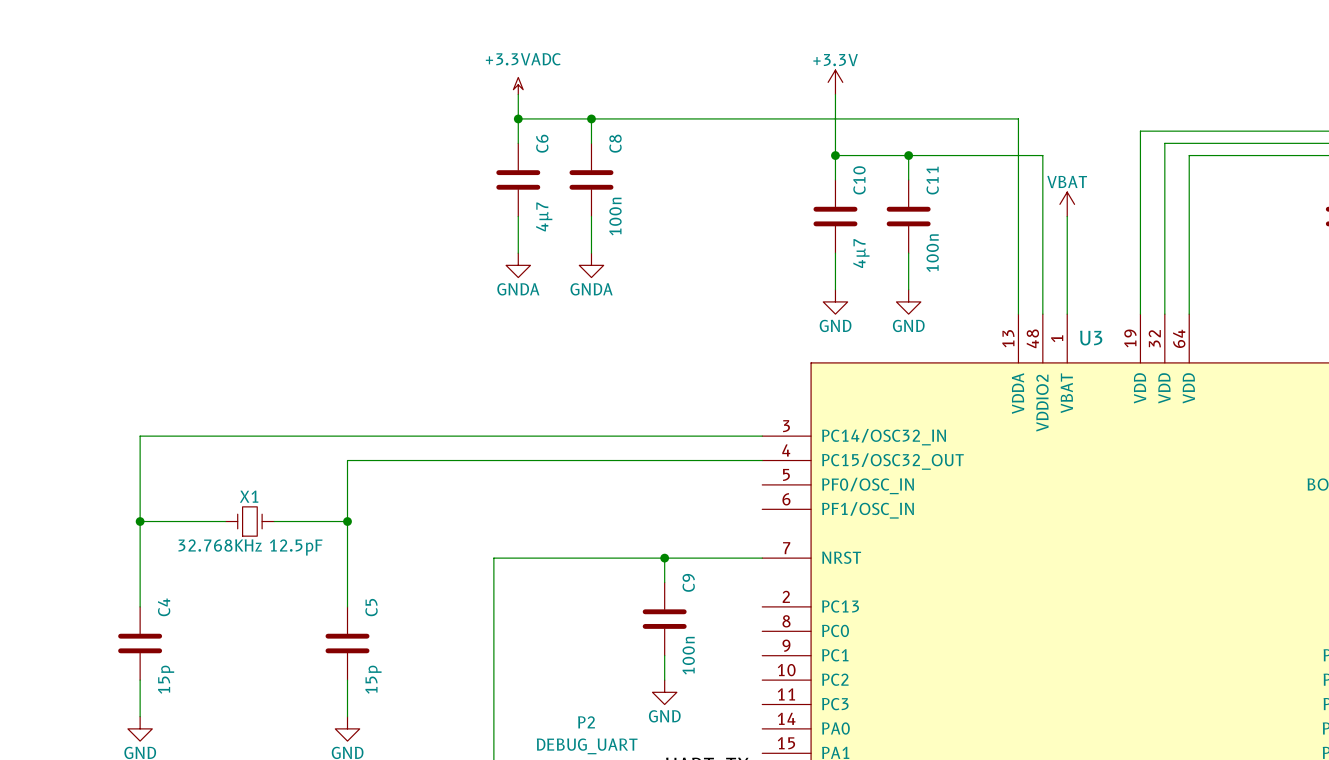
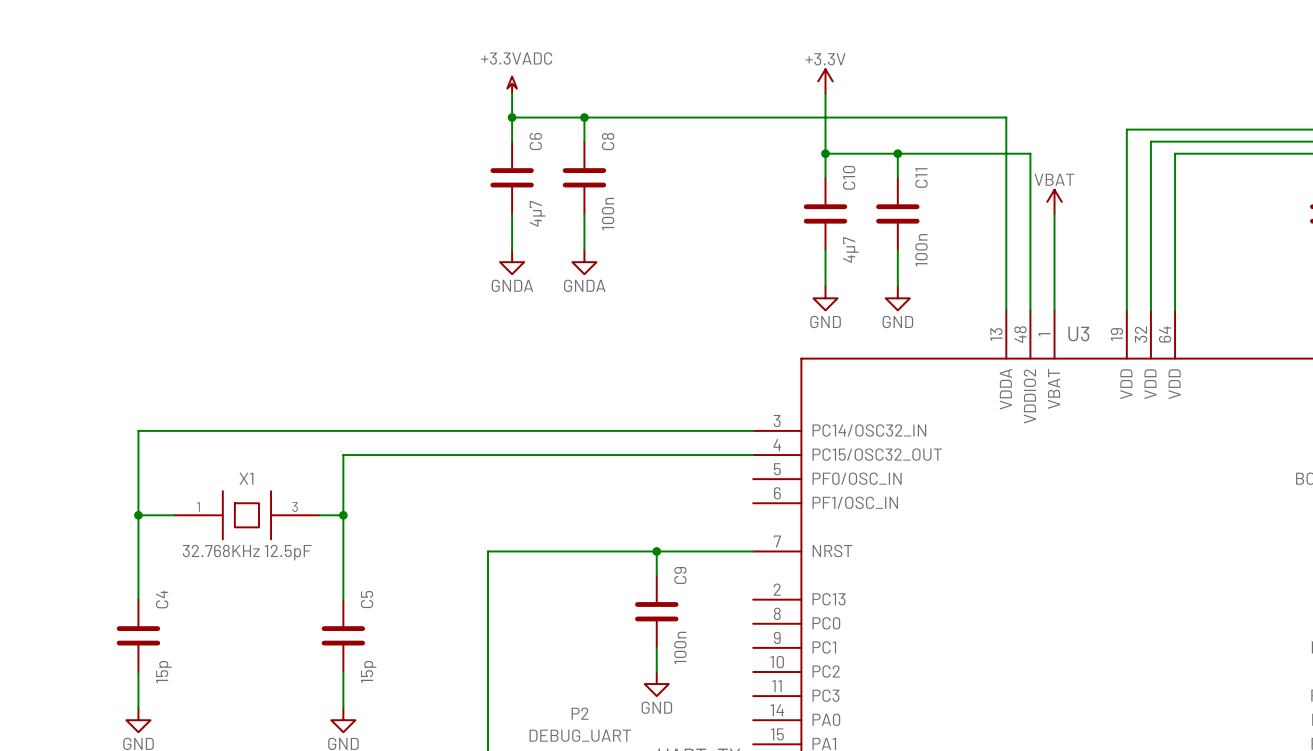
X1 symbol: [225, 506, 275, 537] -> [174, 491, 320, 540]

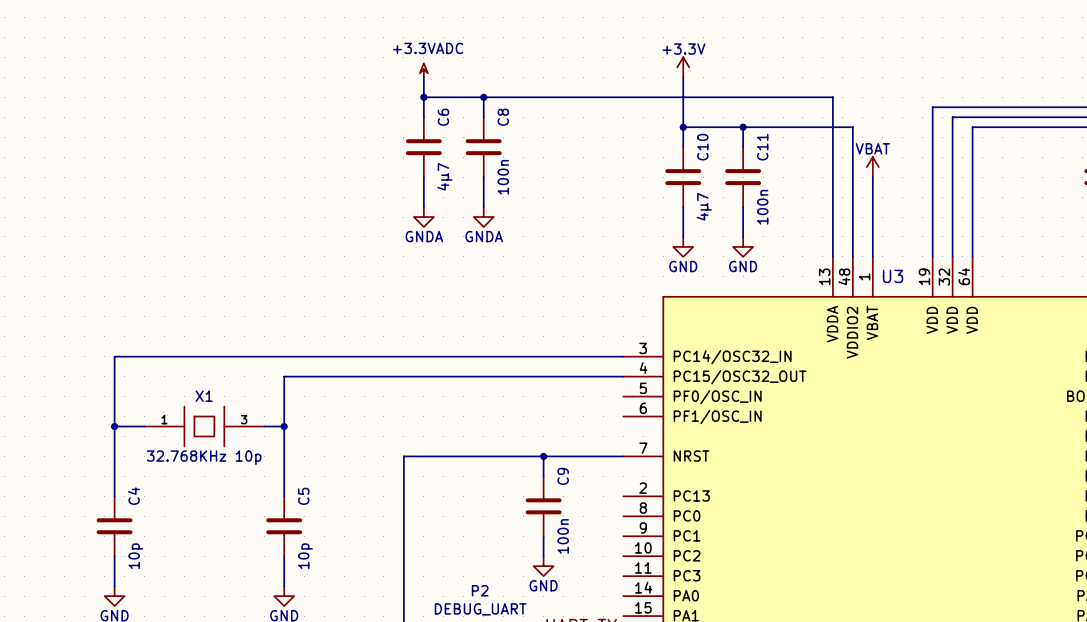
X1 value: 32.768KHz 12.5pF (247, 552) -> 32.768KHz 10p (204, 457)
C4 value: 15p (163, 672) -> 10p (135, 556)
C5 value: 15p (368, 672) -> 10p (305, 556)

